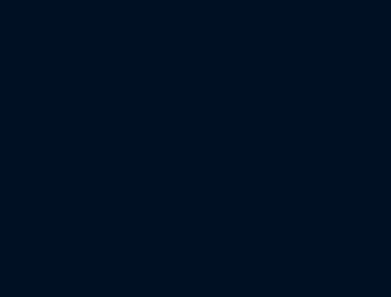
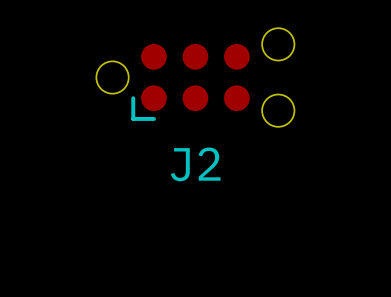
J2: none -> (195, 77)

